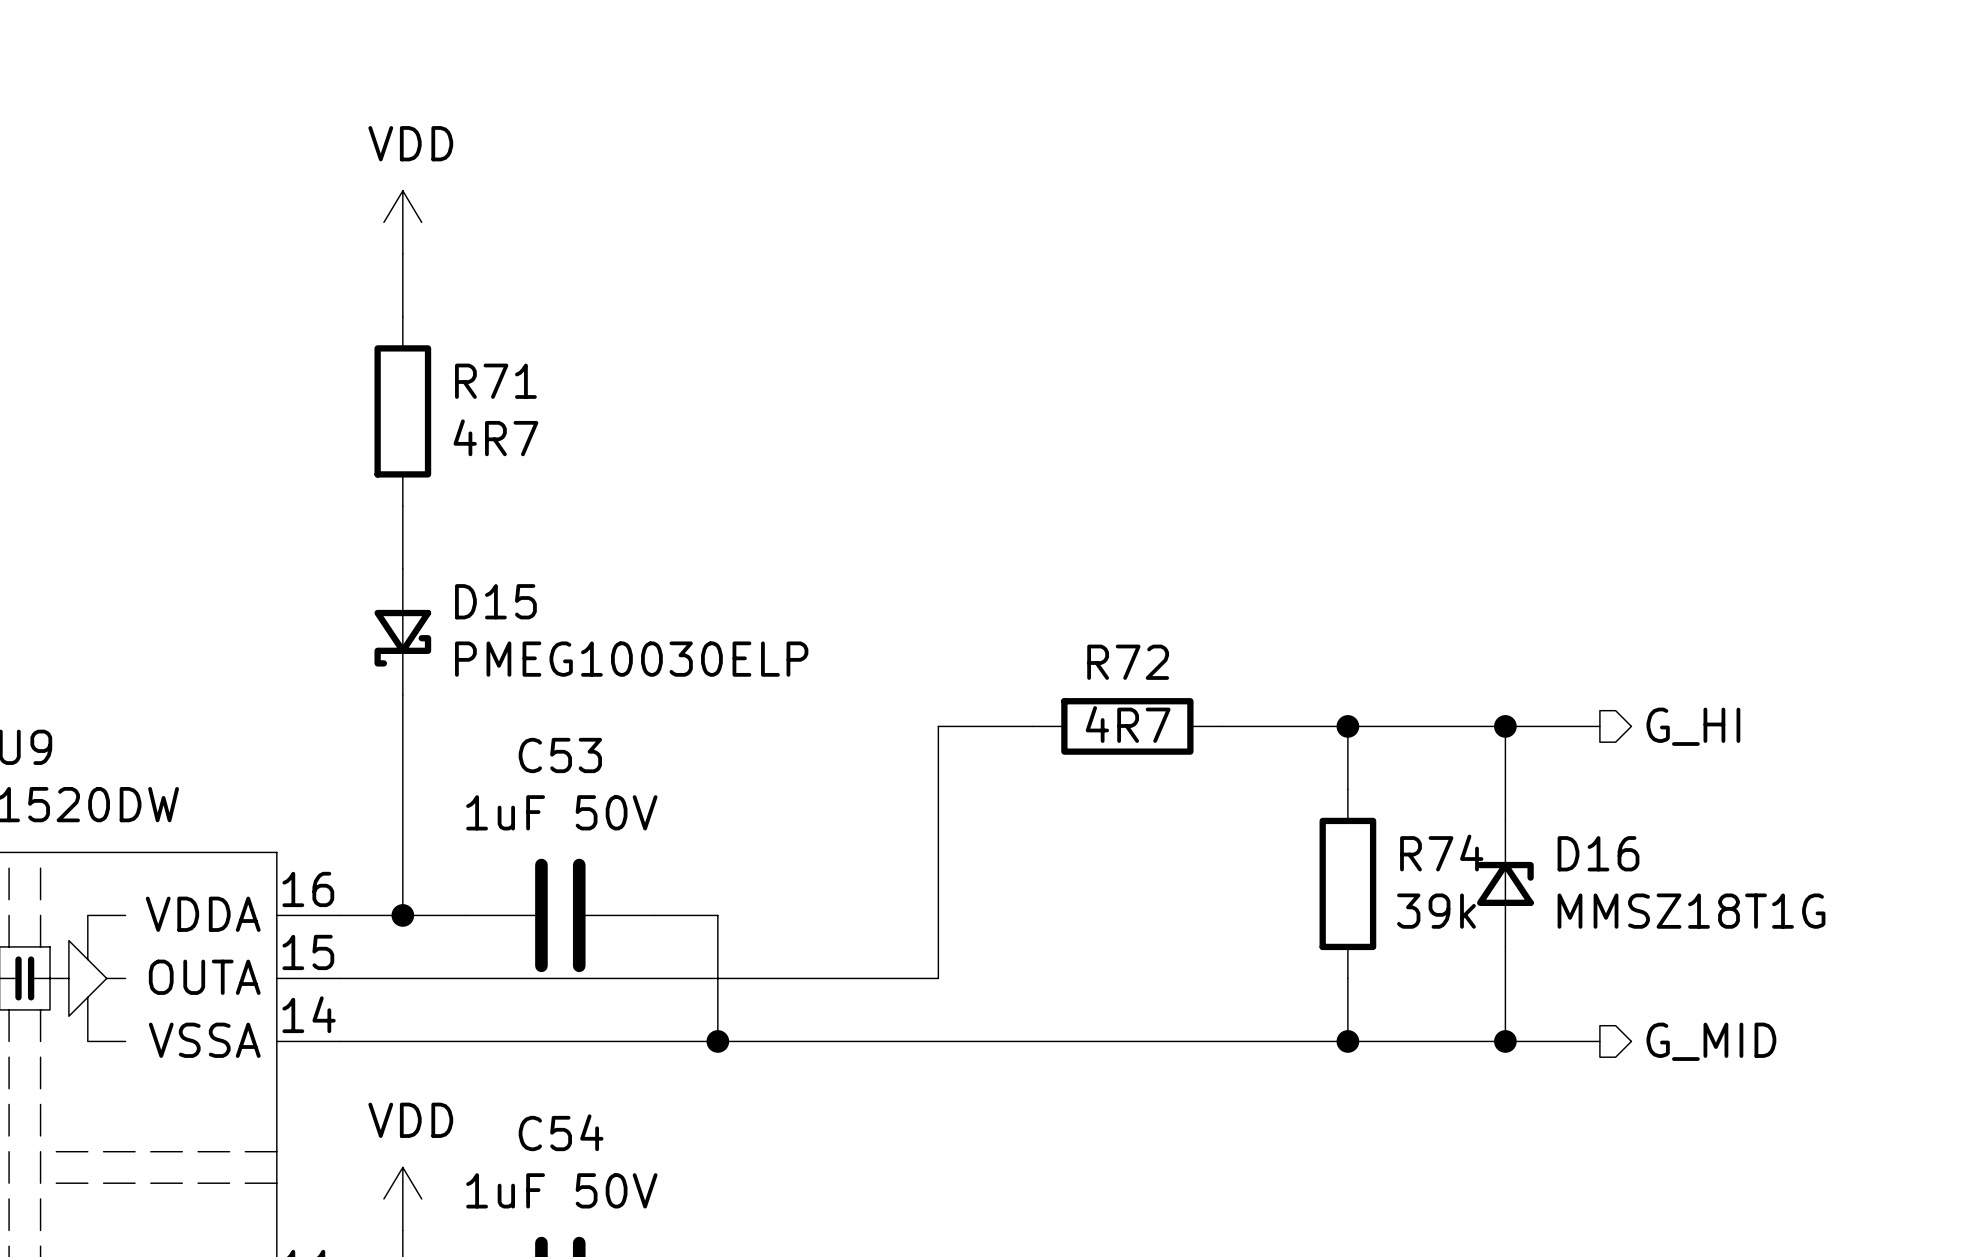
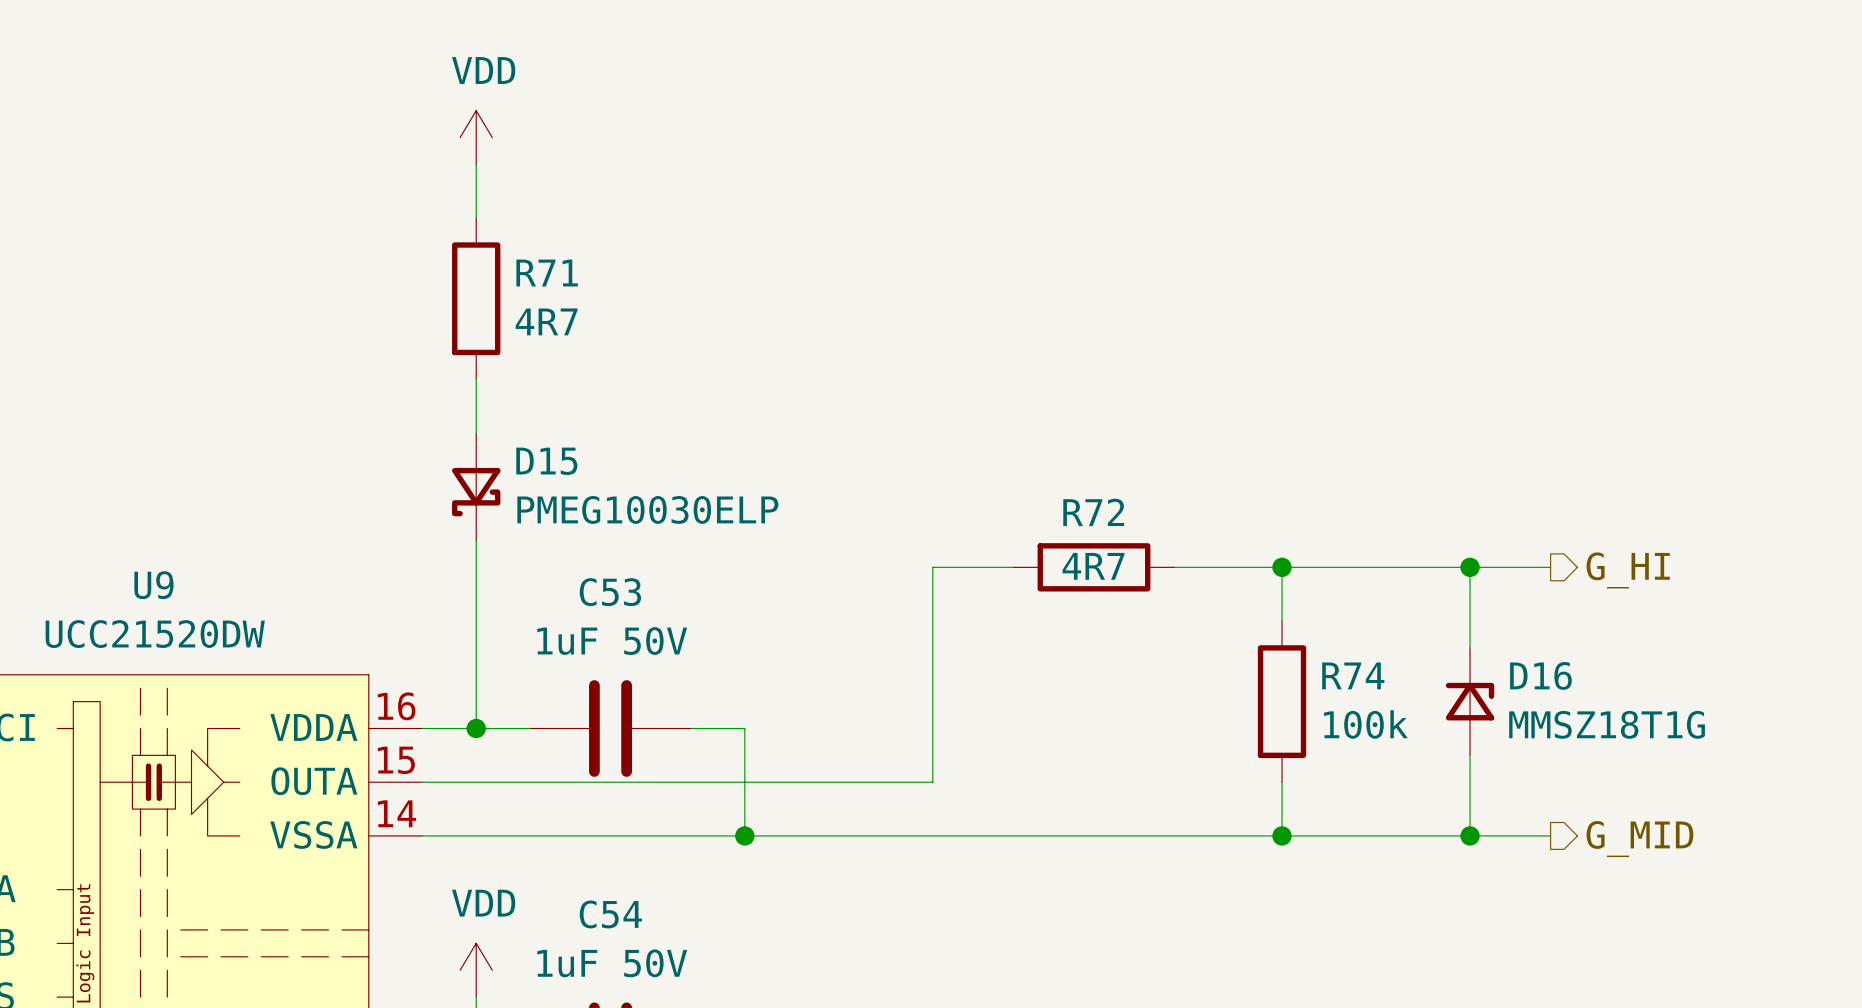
wire: (1505, 726) (1505, 820) -> (1470, 567) (1470, 647)
junction position: (1505, 726) -> (1470, 567)
wire: none -> (1496, 567) (1550, 567)
hierarchical label position: G_HI (1693, 726) -> G_HI (1628, 570)
D16 position: (1505, 883) -> (1470, 701)
R74 value: 39k (1436, 911) -> 100k (1365, 724)
wire: (1505, 946) (1505, 1041) -> (1470, 755) (1470, 835)
junction position: (1505, 1041) -> (1470, 835)
wire: none -> (1496, 835) (1550, 835)
hierarchical label position: G_MID (1711, 1041) -> G_MID (1639, 839)

